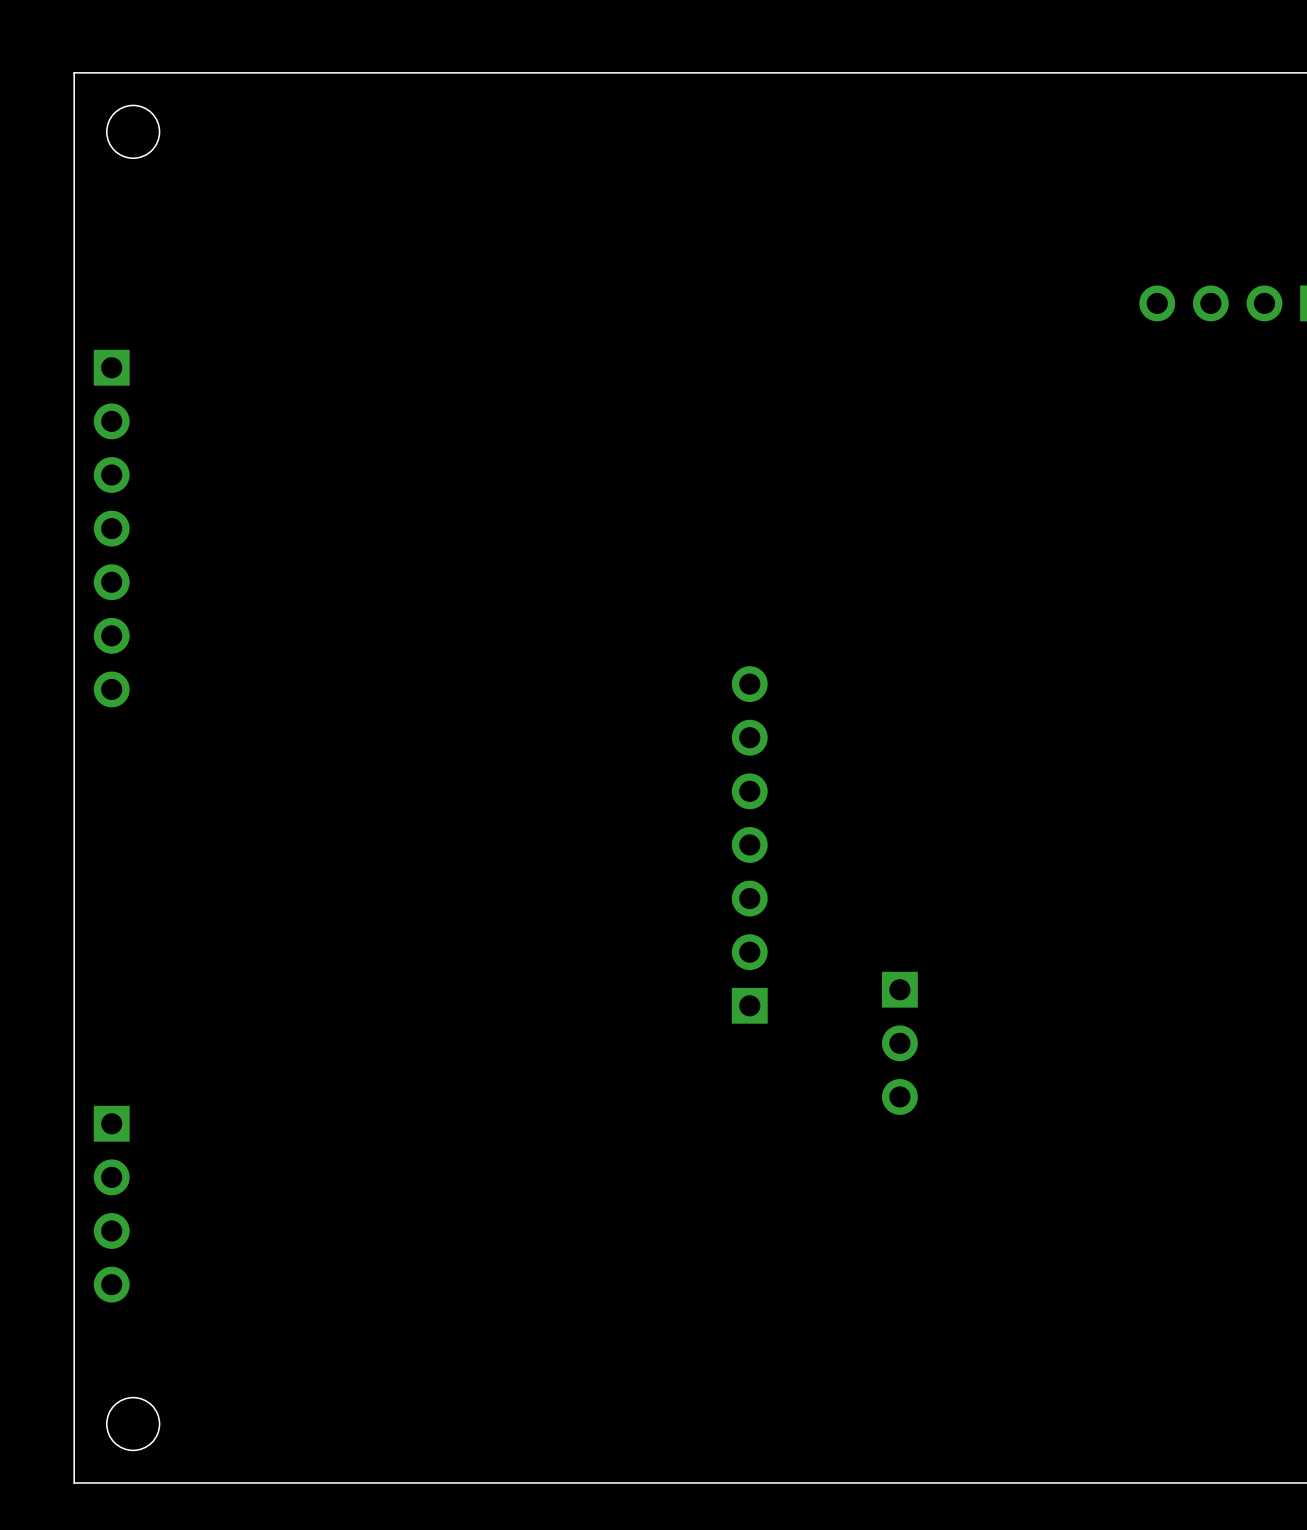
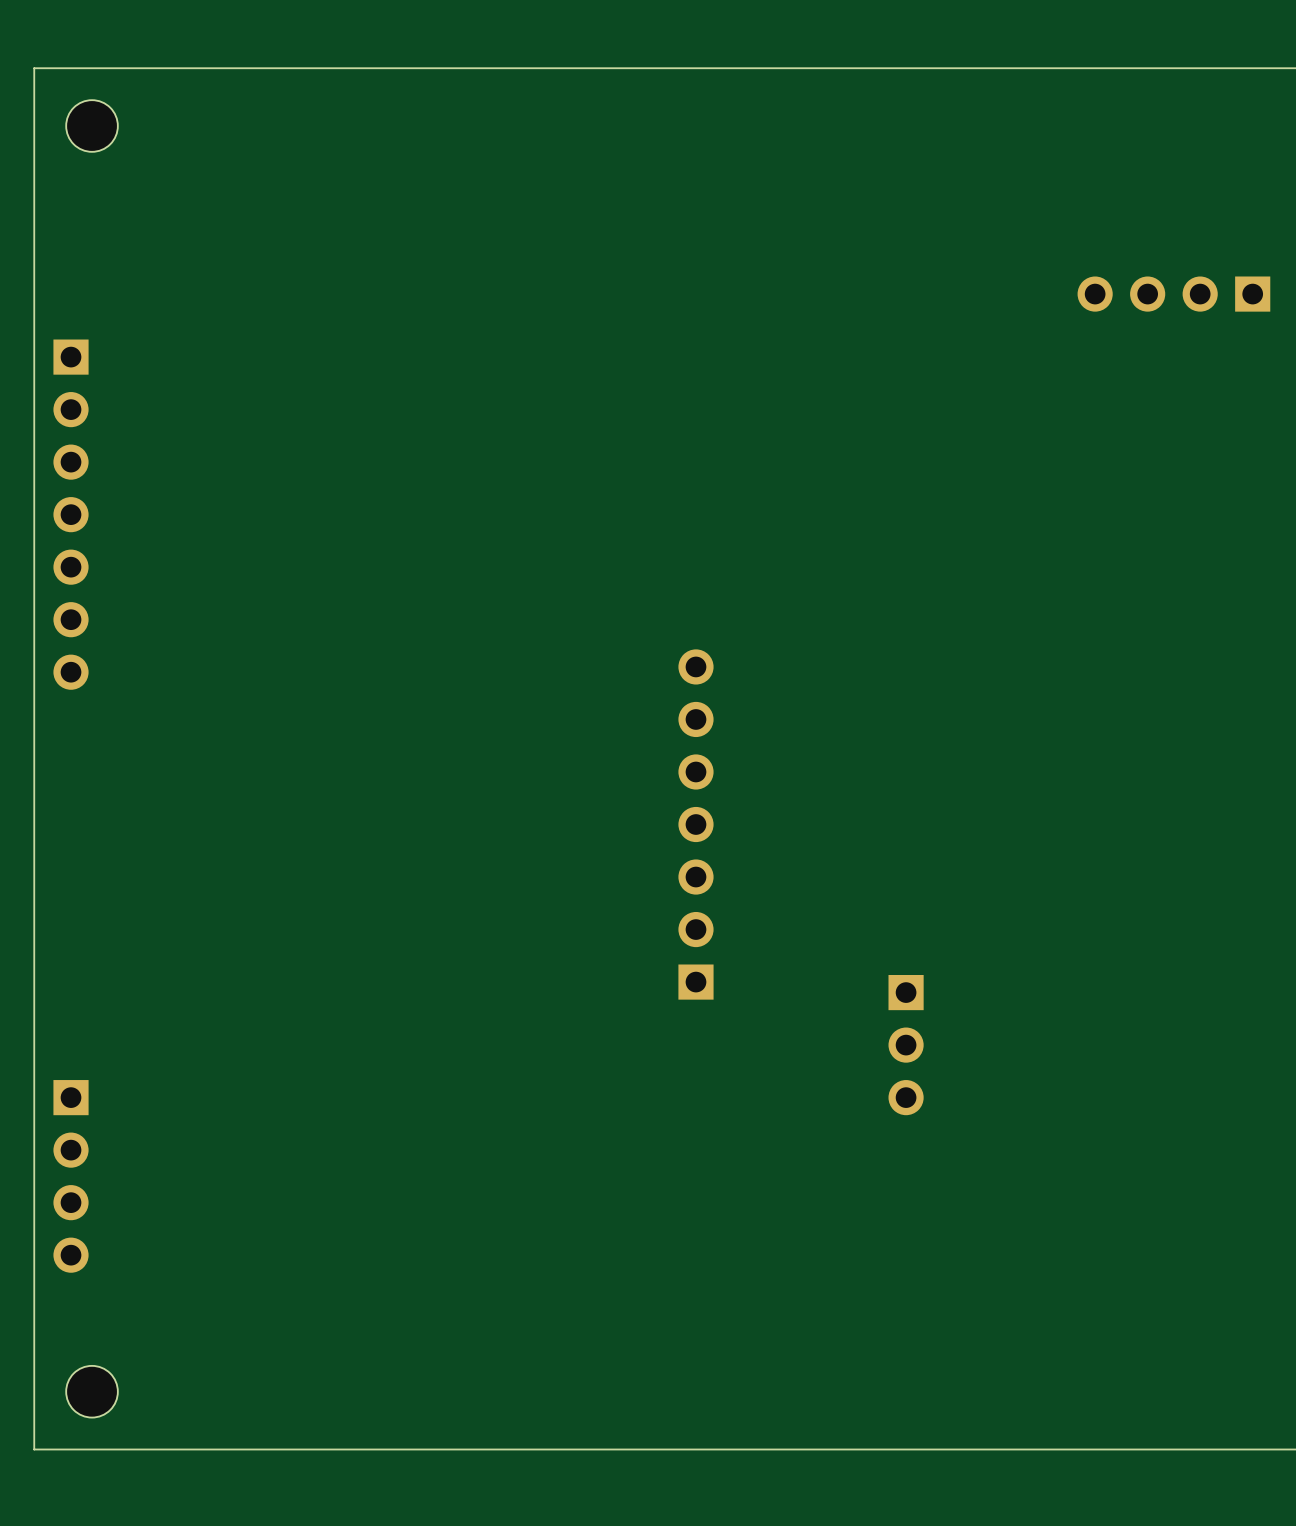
part position: (899, 1043) -> (906, 1045)

